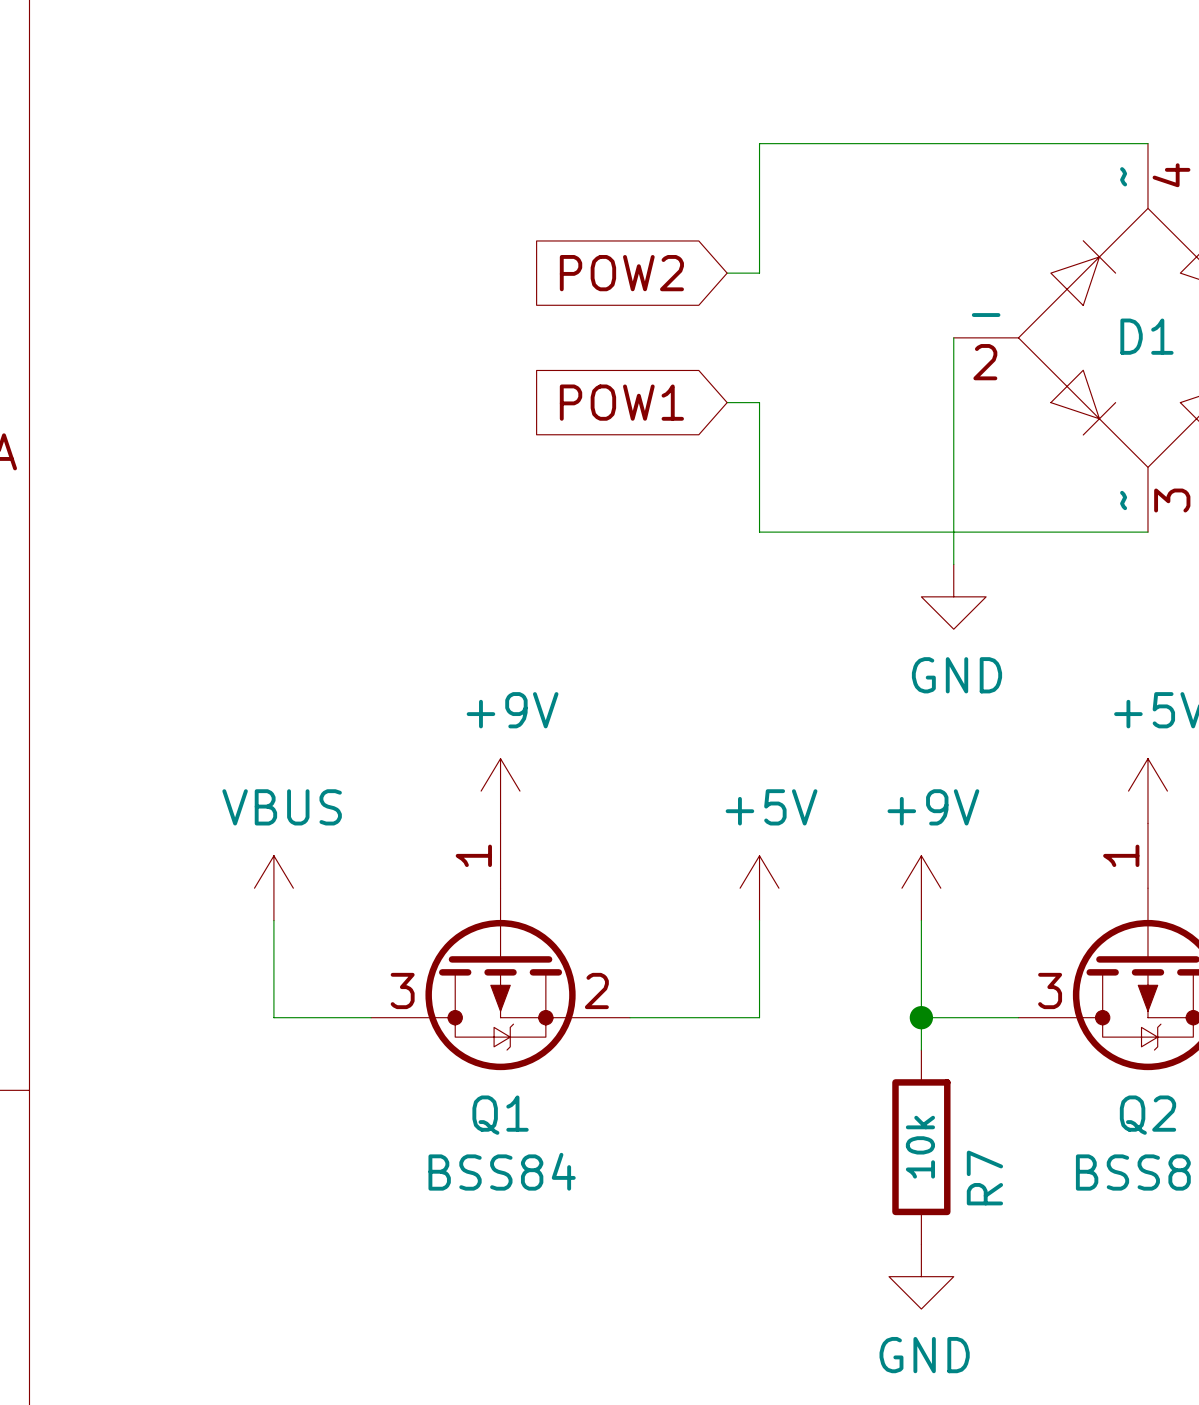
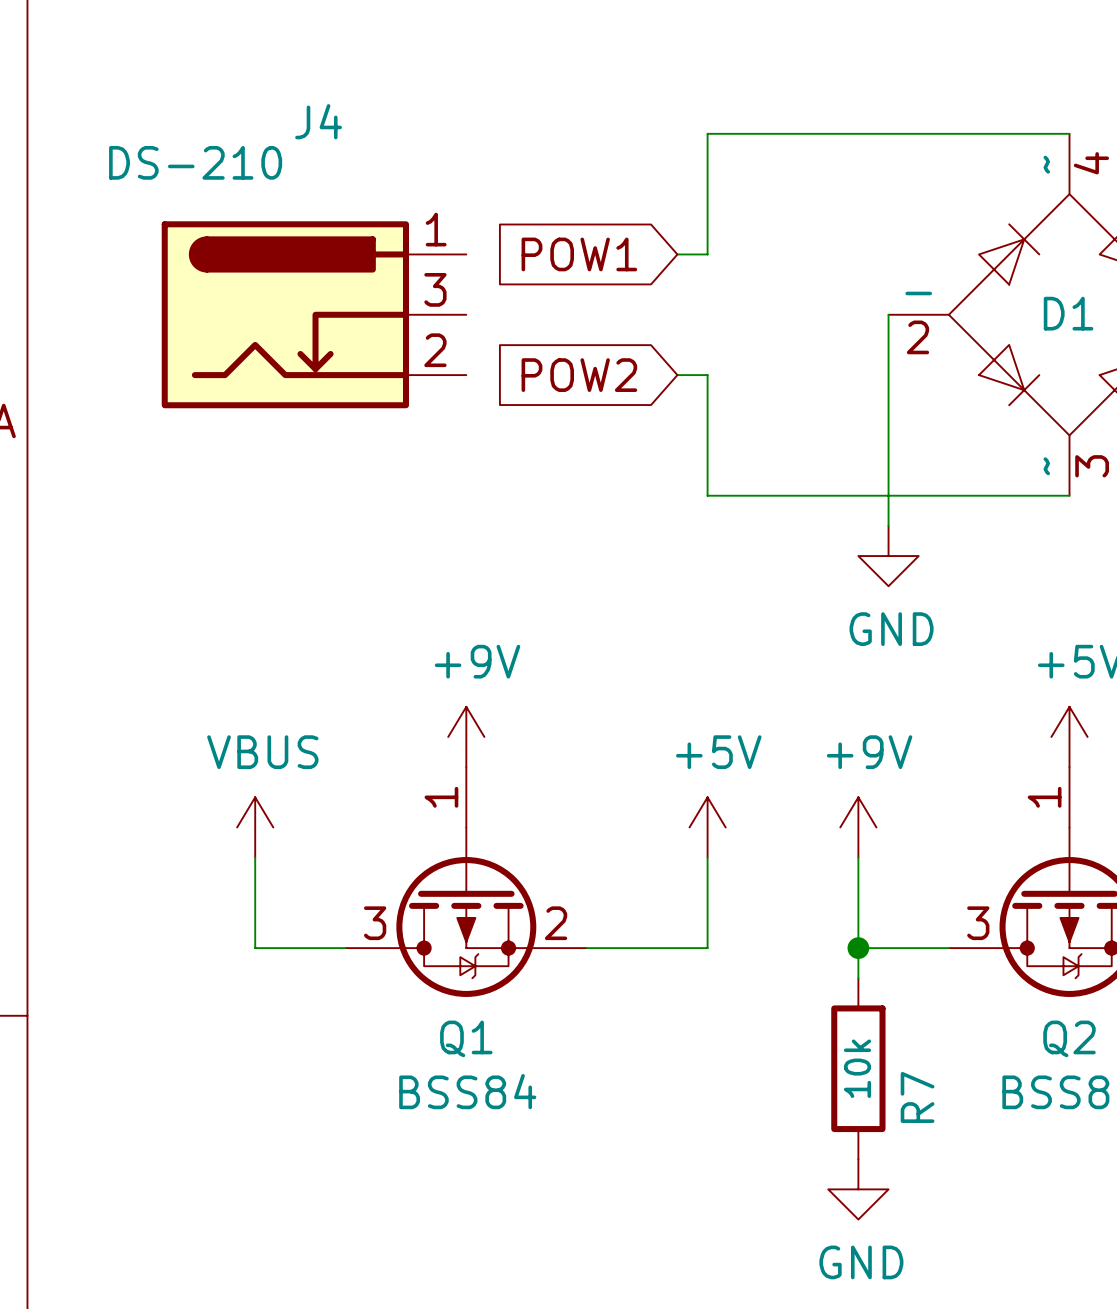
global label: POW2 (621, 273) -> POW1 (579, 254)
J4: none -> DS-210 (314, 314)
global label: POW1 (621, 402) -> POW2 (579, 375)

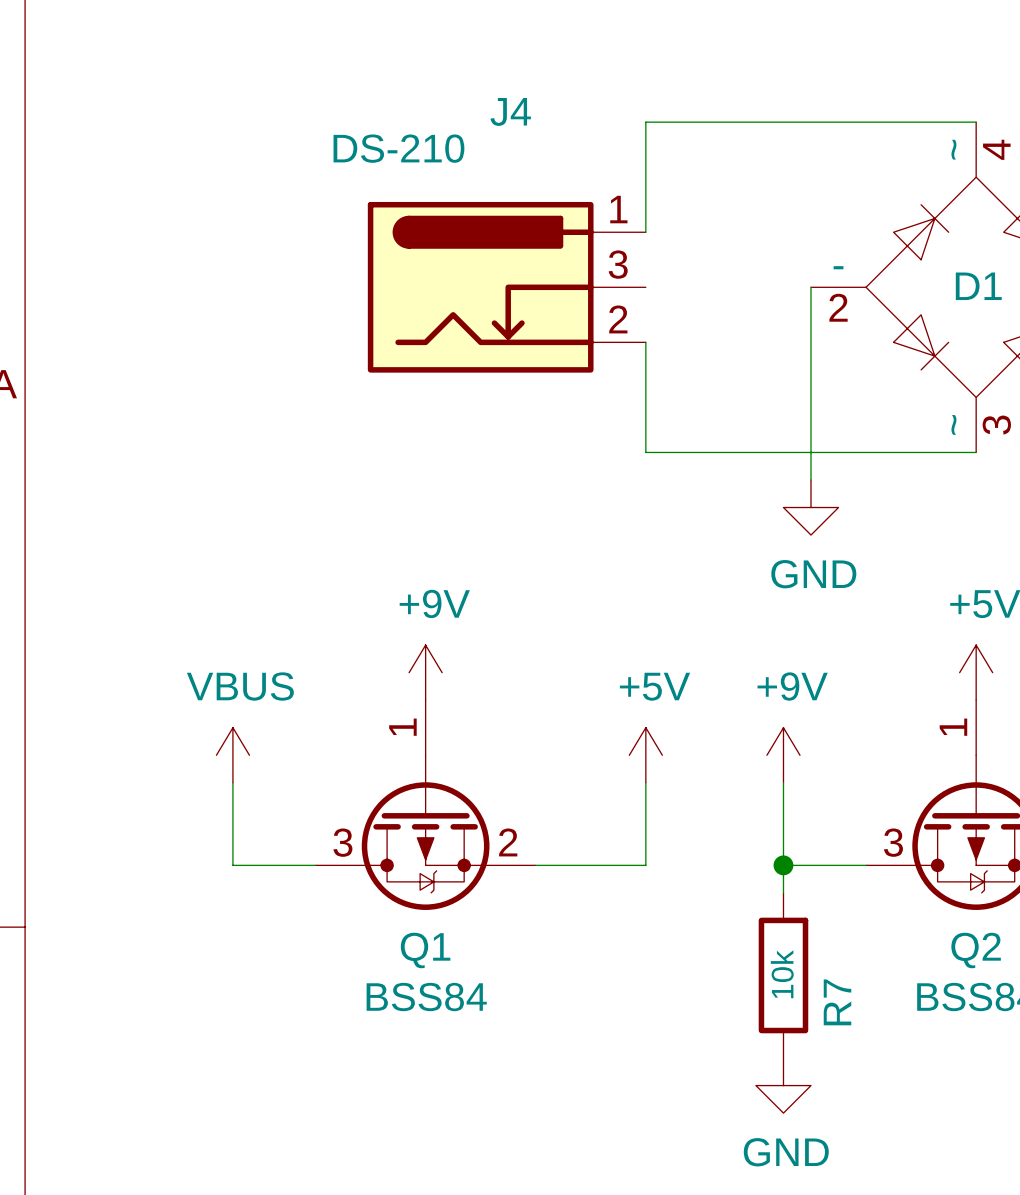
global label: POW1 (579, 254) -> none
J4 position: (314, 314) -> (506, 287)
global label: POW2 (579, 375) -> none

